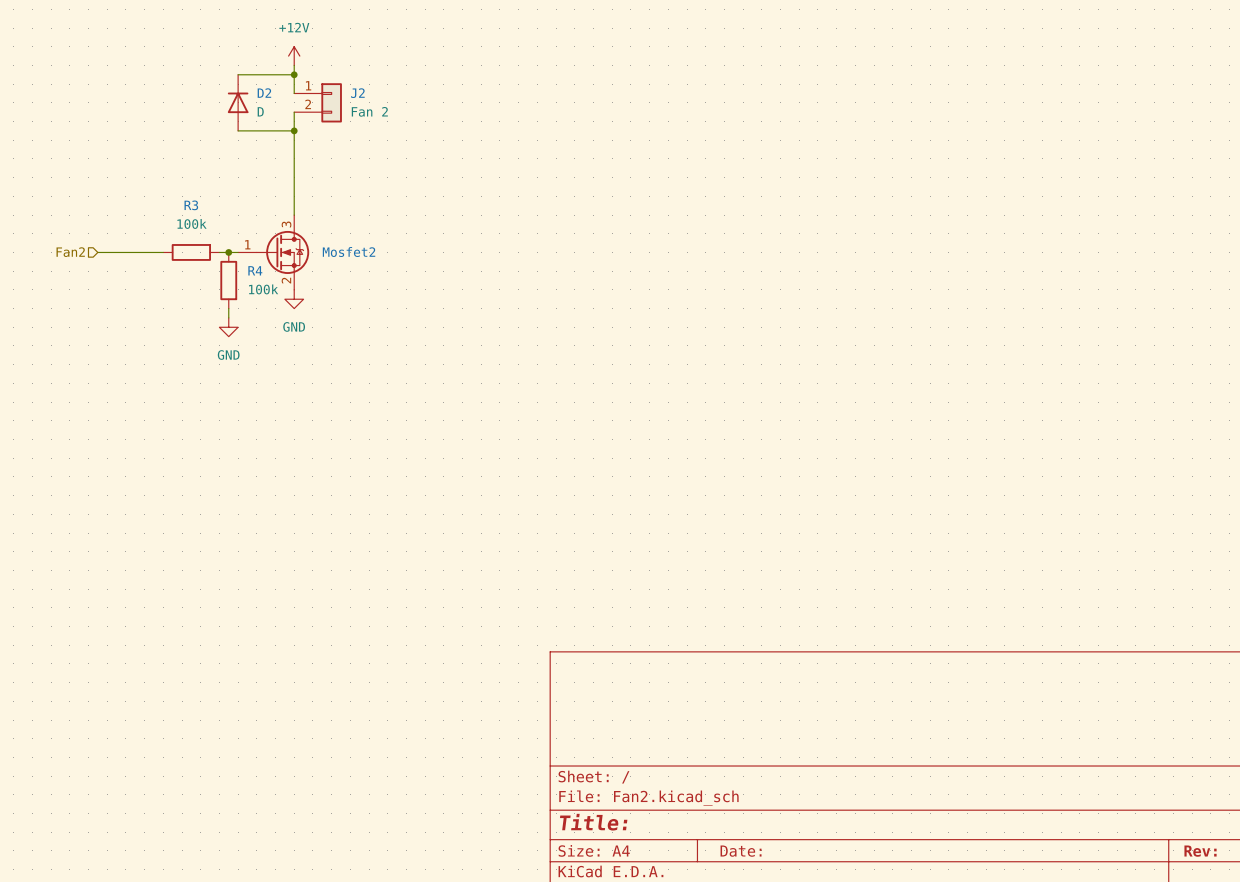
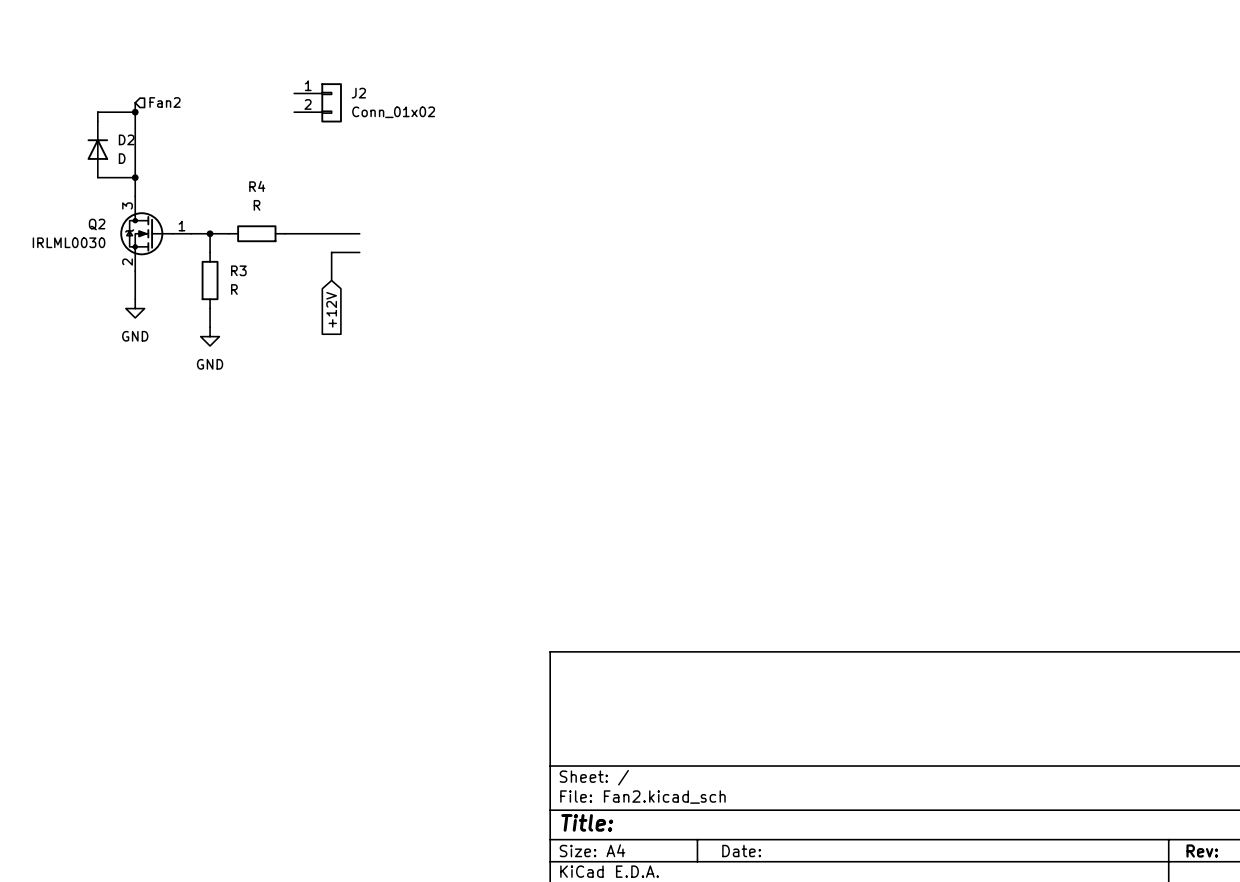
power symbol: +12V (294, 56) -> none
wire: (294, 65) (294, 93) -> none
wire: (238, 74) (294, 74) -> none
junction: (294, 74) -> none
wire: none -> (135, 102) (135, 196)
D2 position: (238, 102) -> (97, 149)
J2 value: Fan 2 (369, 111) -> Conn_01x02 (393, 112)
wire: none -> (135, 112) (97, 112) (97, 121)
junction: none -> (135, 112)
wire: (294, 112) (294, 215) -> none
wire: (238, 130) (294, 130) -> none
junction: (294, 130) -> none
wire: none -> (97, 177) (135, 177)
junction: none -> (135, 177)
R3 name position: R3 (191, 205) -> R3 (238, 270)
R3 value: 100k (192, 223) -> R (234, 289)
Q2: none -> IRLML0030 (155, 233)
wire: none -> (191, 233) (228, 233)
wire: none -> (210, 233) (210, 252)
wire: none -> (284, 233) (359, 233)
hierarchical label rotation: 0° (70, 252) -> 180° (165, 102)
hierarchical label position: Fan2 (70, 252) -> Fan2 (165, 102)
wire: (97, 252) (163, 252) -> none
R3 rotation: 0° (191, 252) -> 90° clockwise (210, 280)
R3 position: (191, 252) -> (210, 280)
wire: (219, 252) (238, 252) -> none
junction position: (228, 252) -> (210, 233)
Mosfet2: (273, 252) -> none
wire: none -> (359, 252) (331, 252) (331, 280)
R4 name position: R4 (255, 270) -> R4 (257, 186)
wire: none -> (135, 271) (135, 299)
R4 rotation: 0° (228, 280) -> 90° clockwise (256, 233)
R4 position: (228, 280) -> (256, 233)
R4 value: 100k (263, 289) -> R (257, 205)
power symbol: GND (294, 299) -> none
global label: none -> +12V (331, 309)
power symbol: none -> GND (135, 308)
wire: none -> (210, 308) (210, 327)
wire: (228, 308) (228, 317) -> none
power symbol position: GND (228, 327) -> GND (210, 336)

